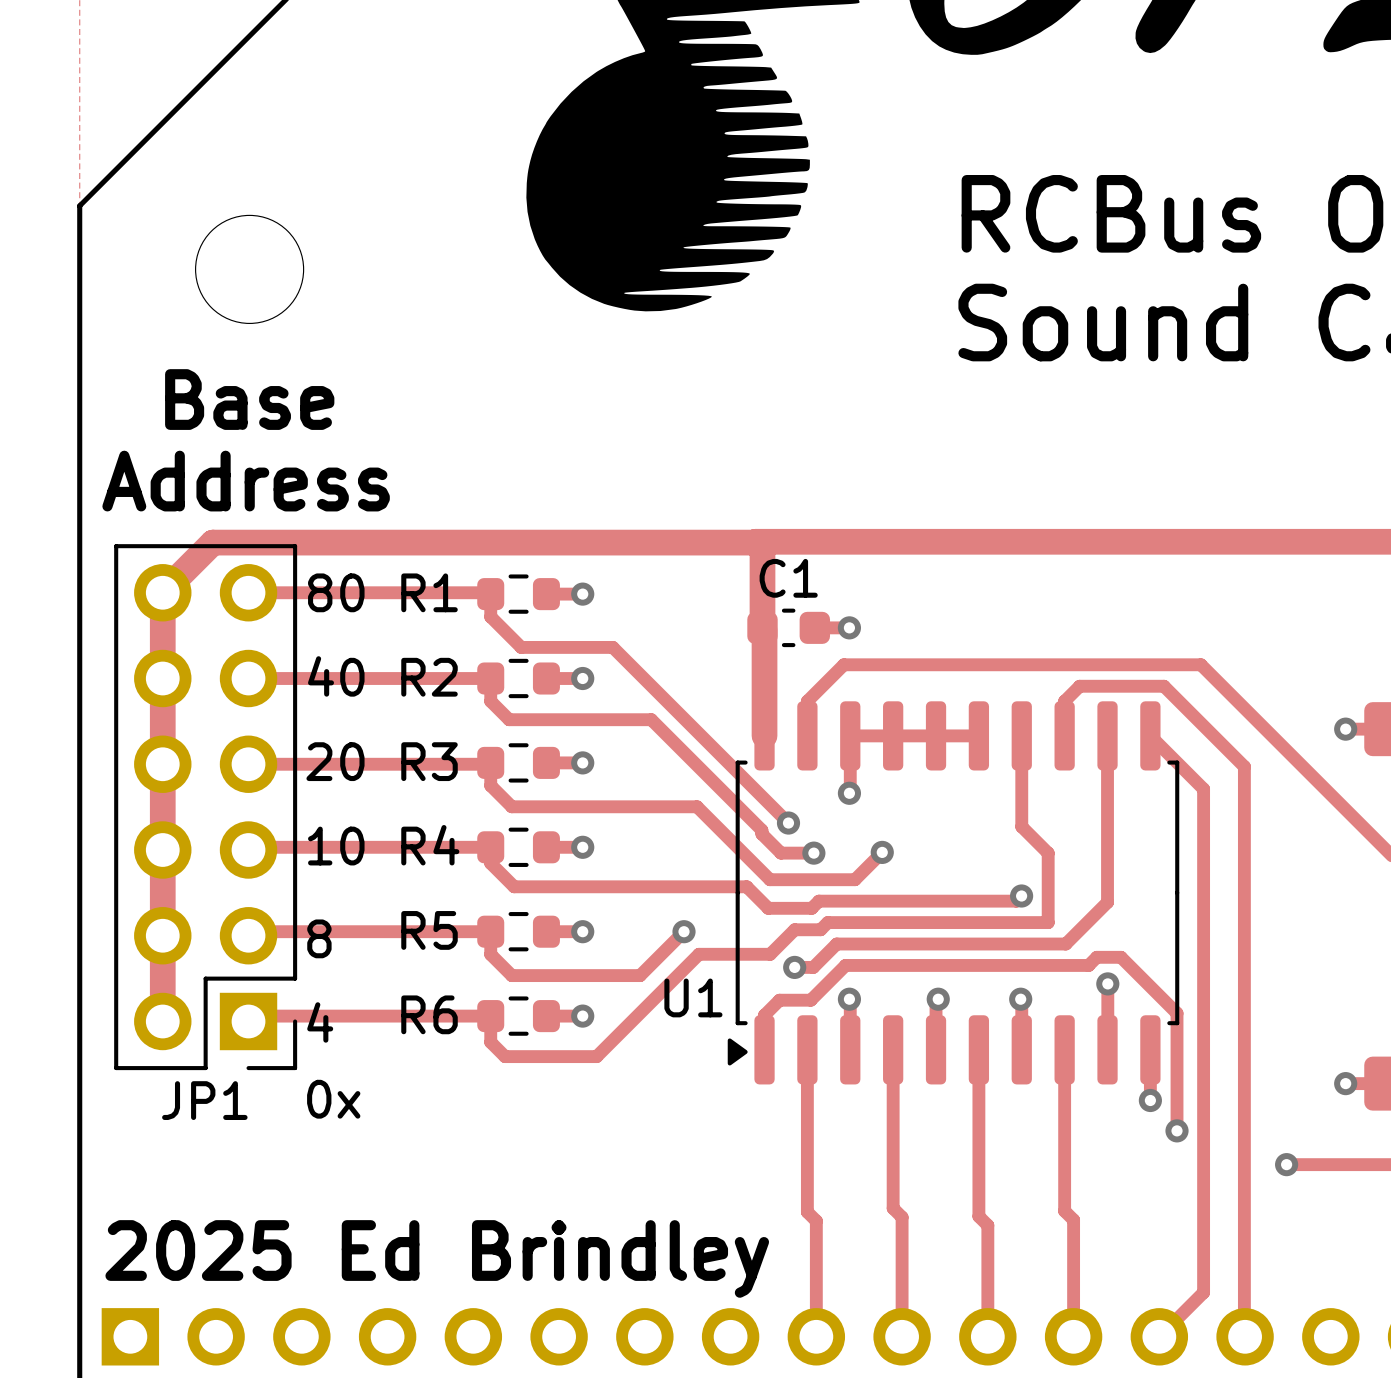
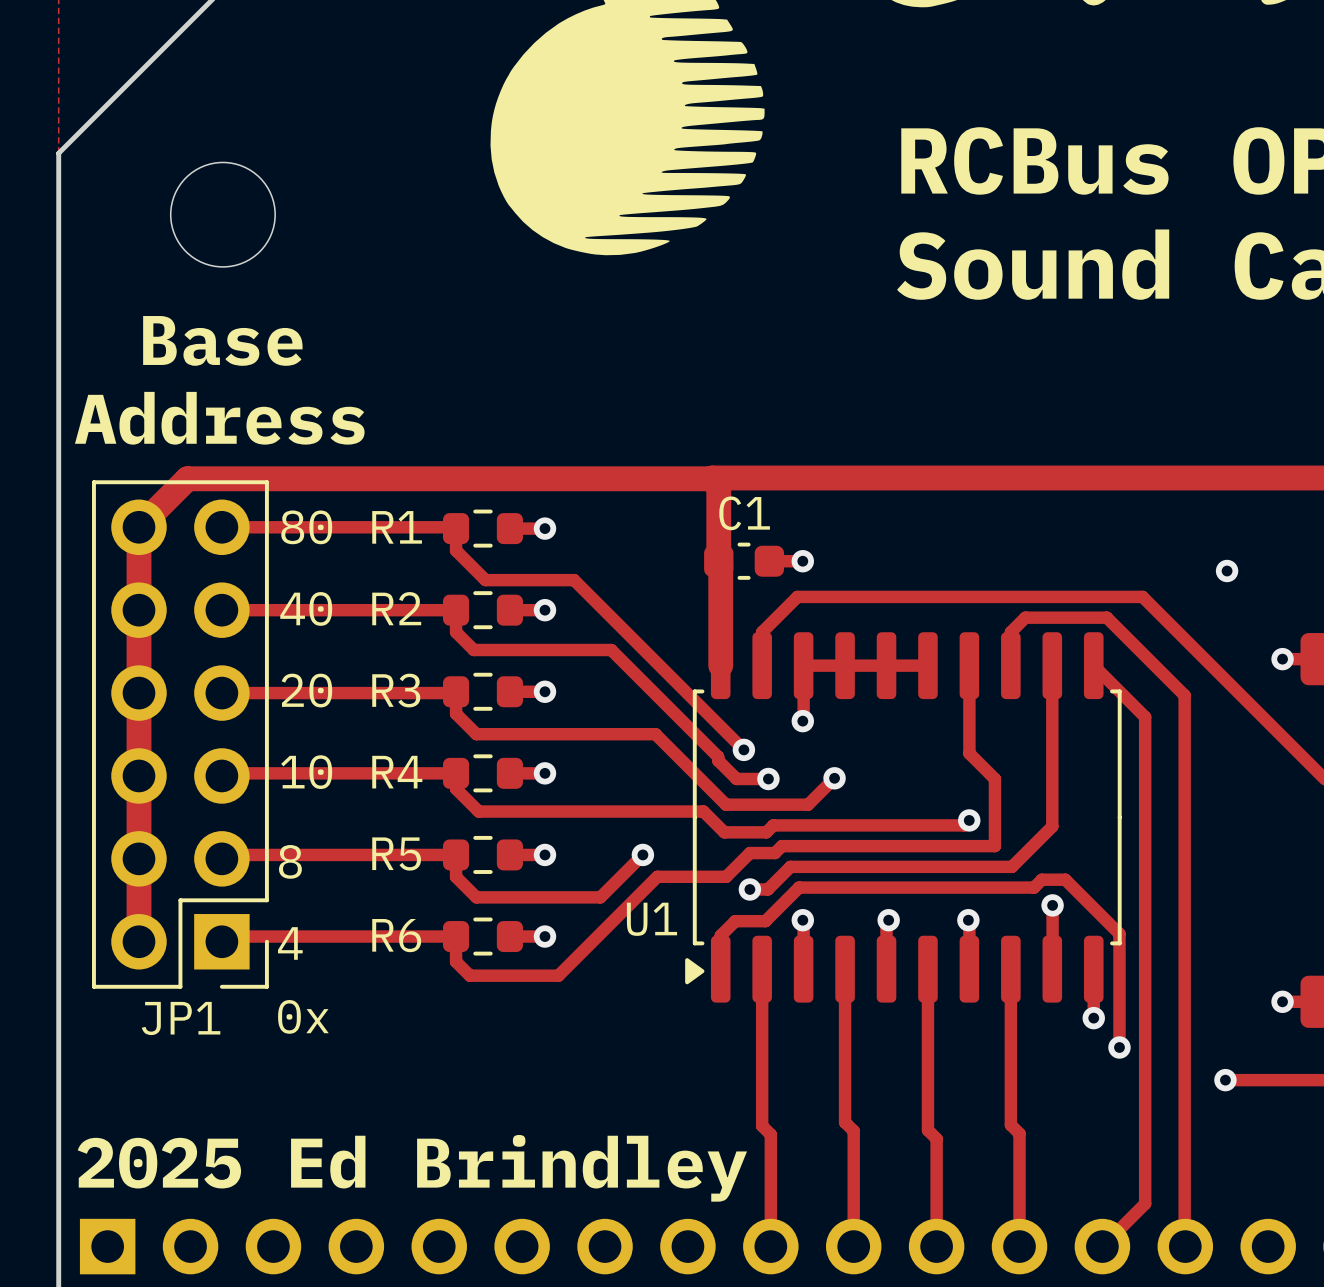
via: none -> (1227, 571)

